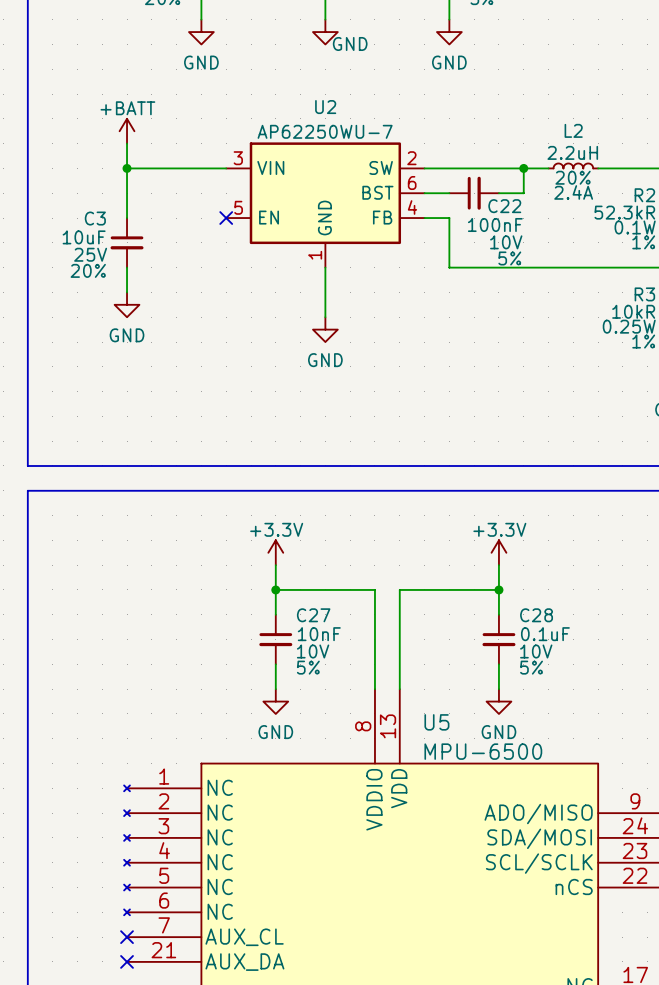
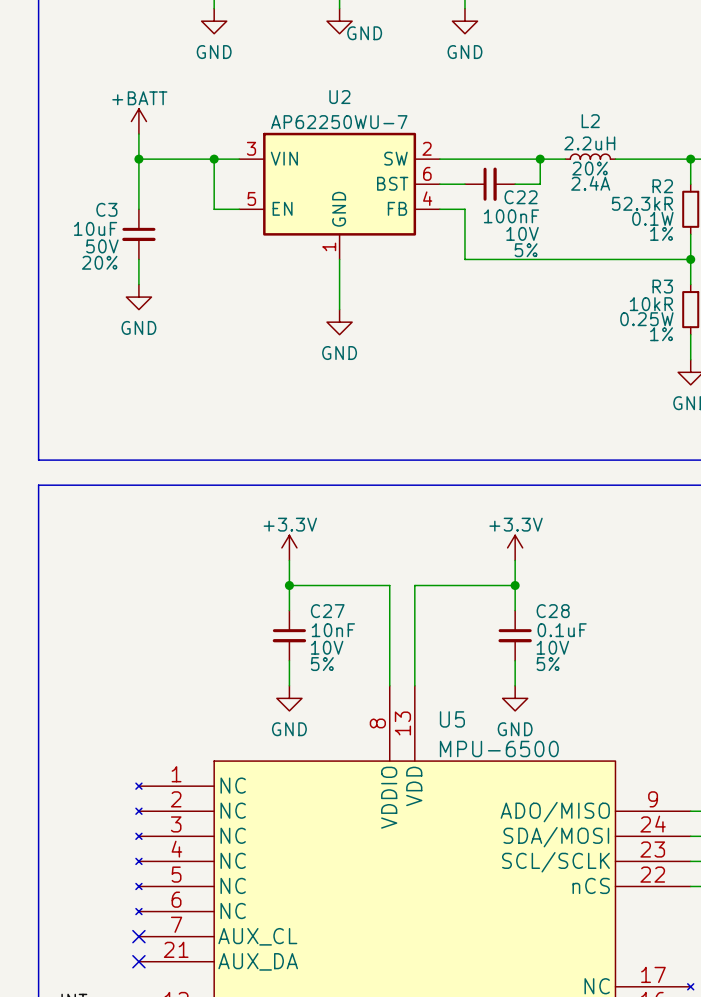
wire: none -> (214, 159) (214, 209) (239, 209)
junction: none -> (214, 159)
no-connect mark: (226, 218) -> none
C3 text: 25V (90, 254) -> 50V (102, 246)

